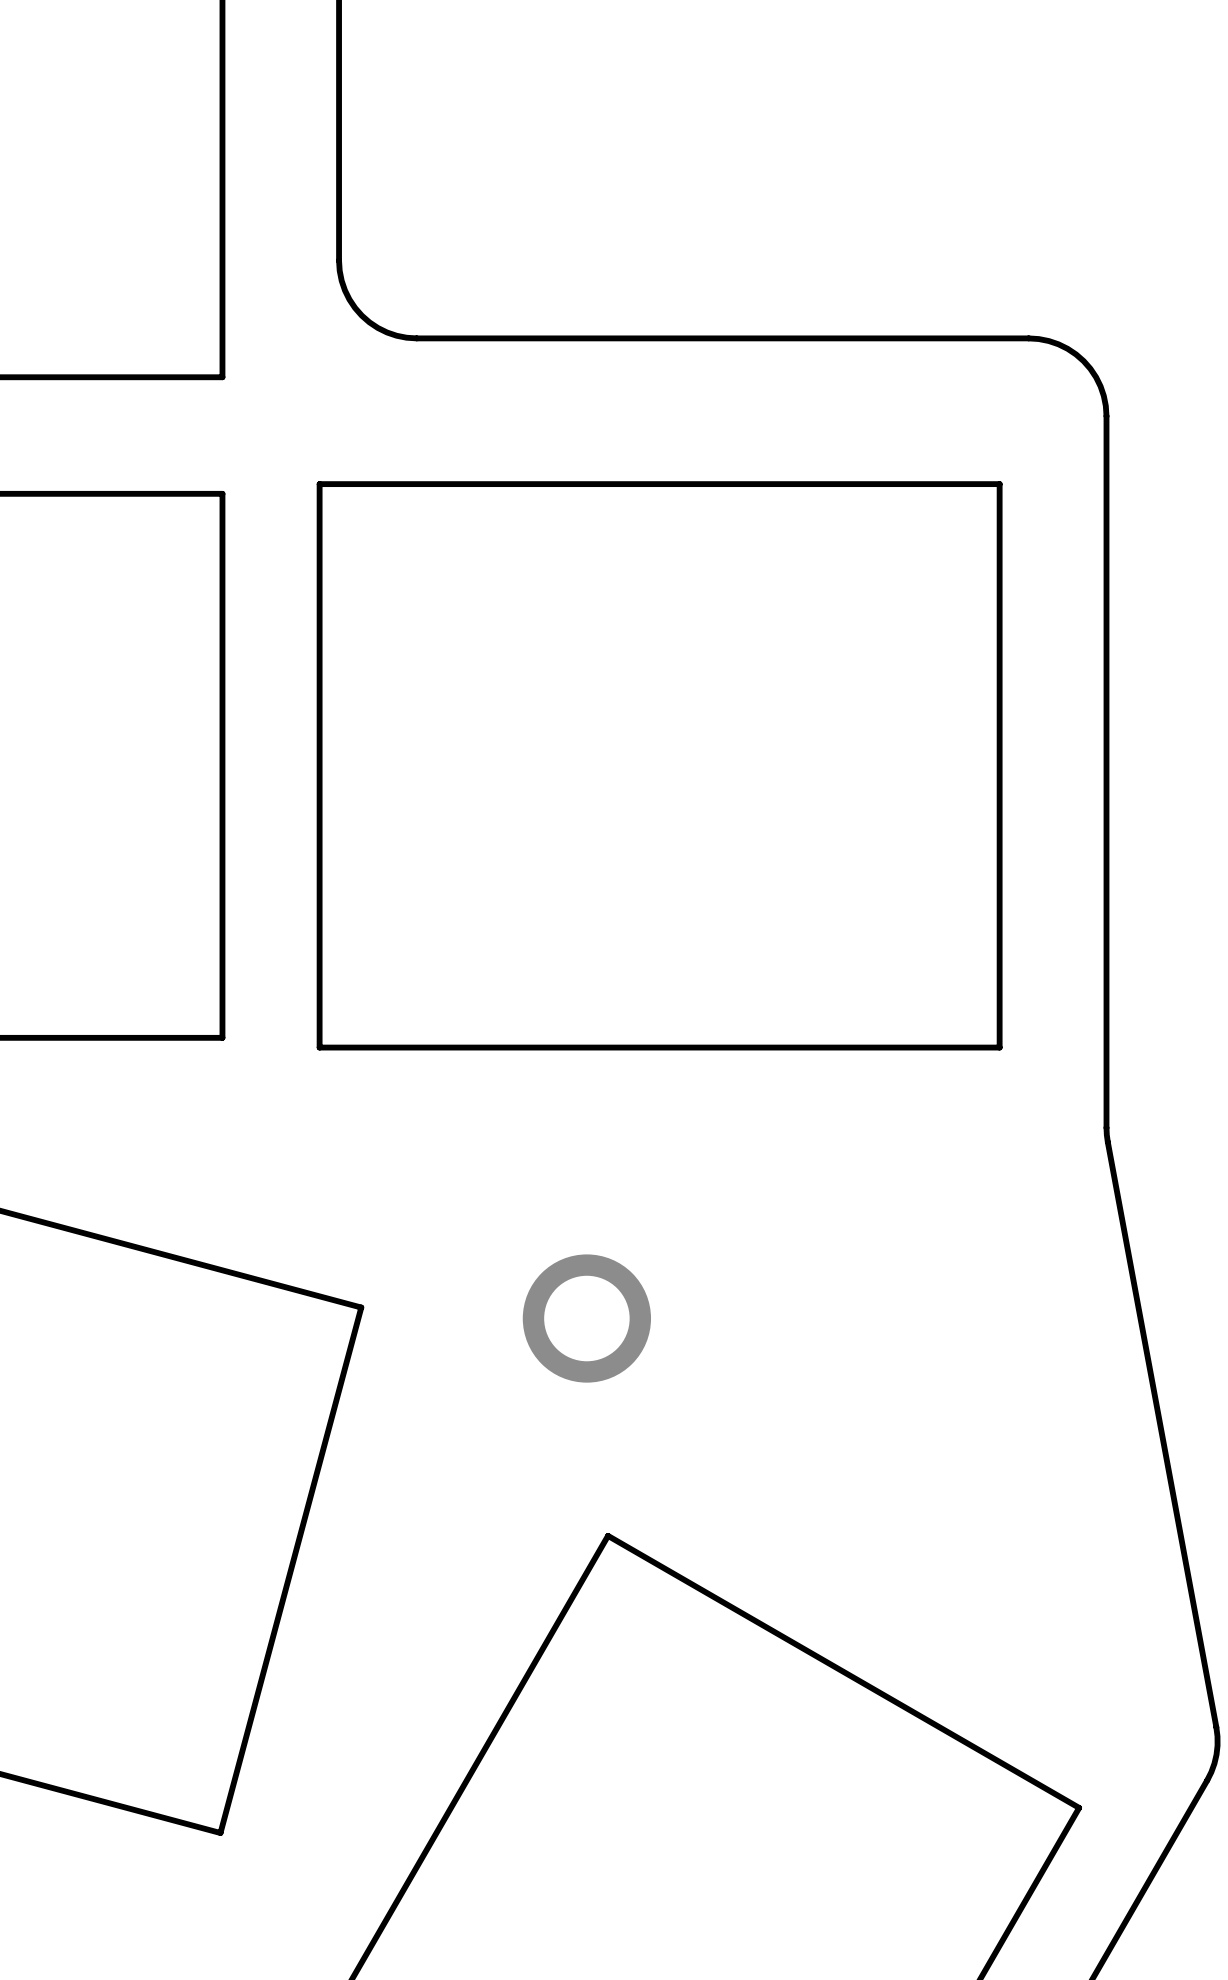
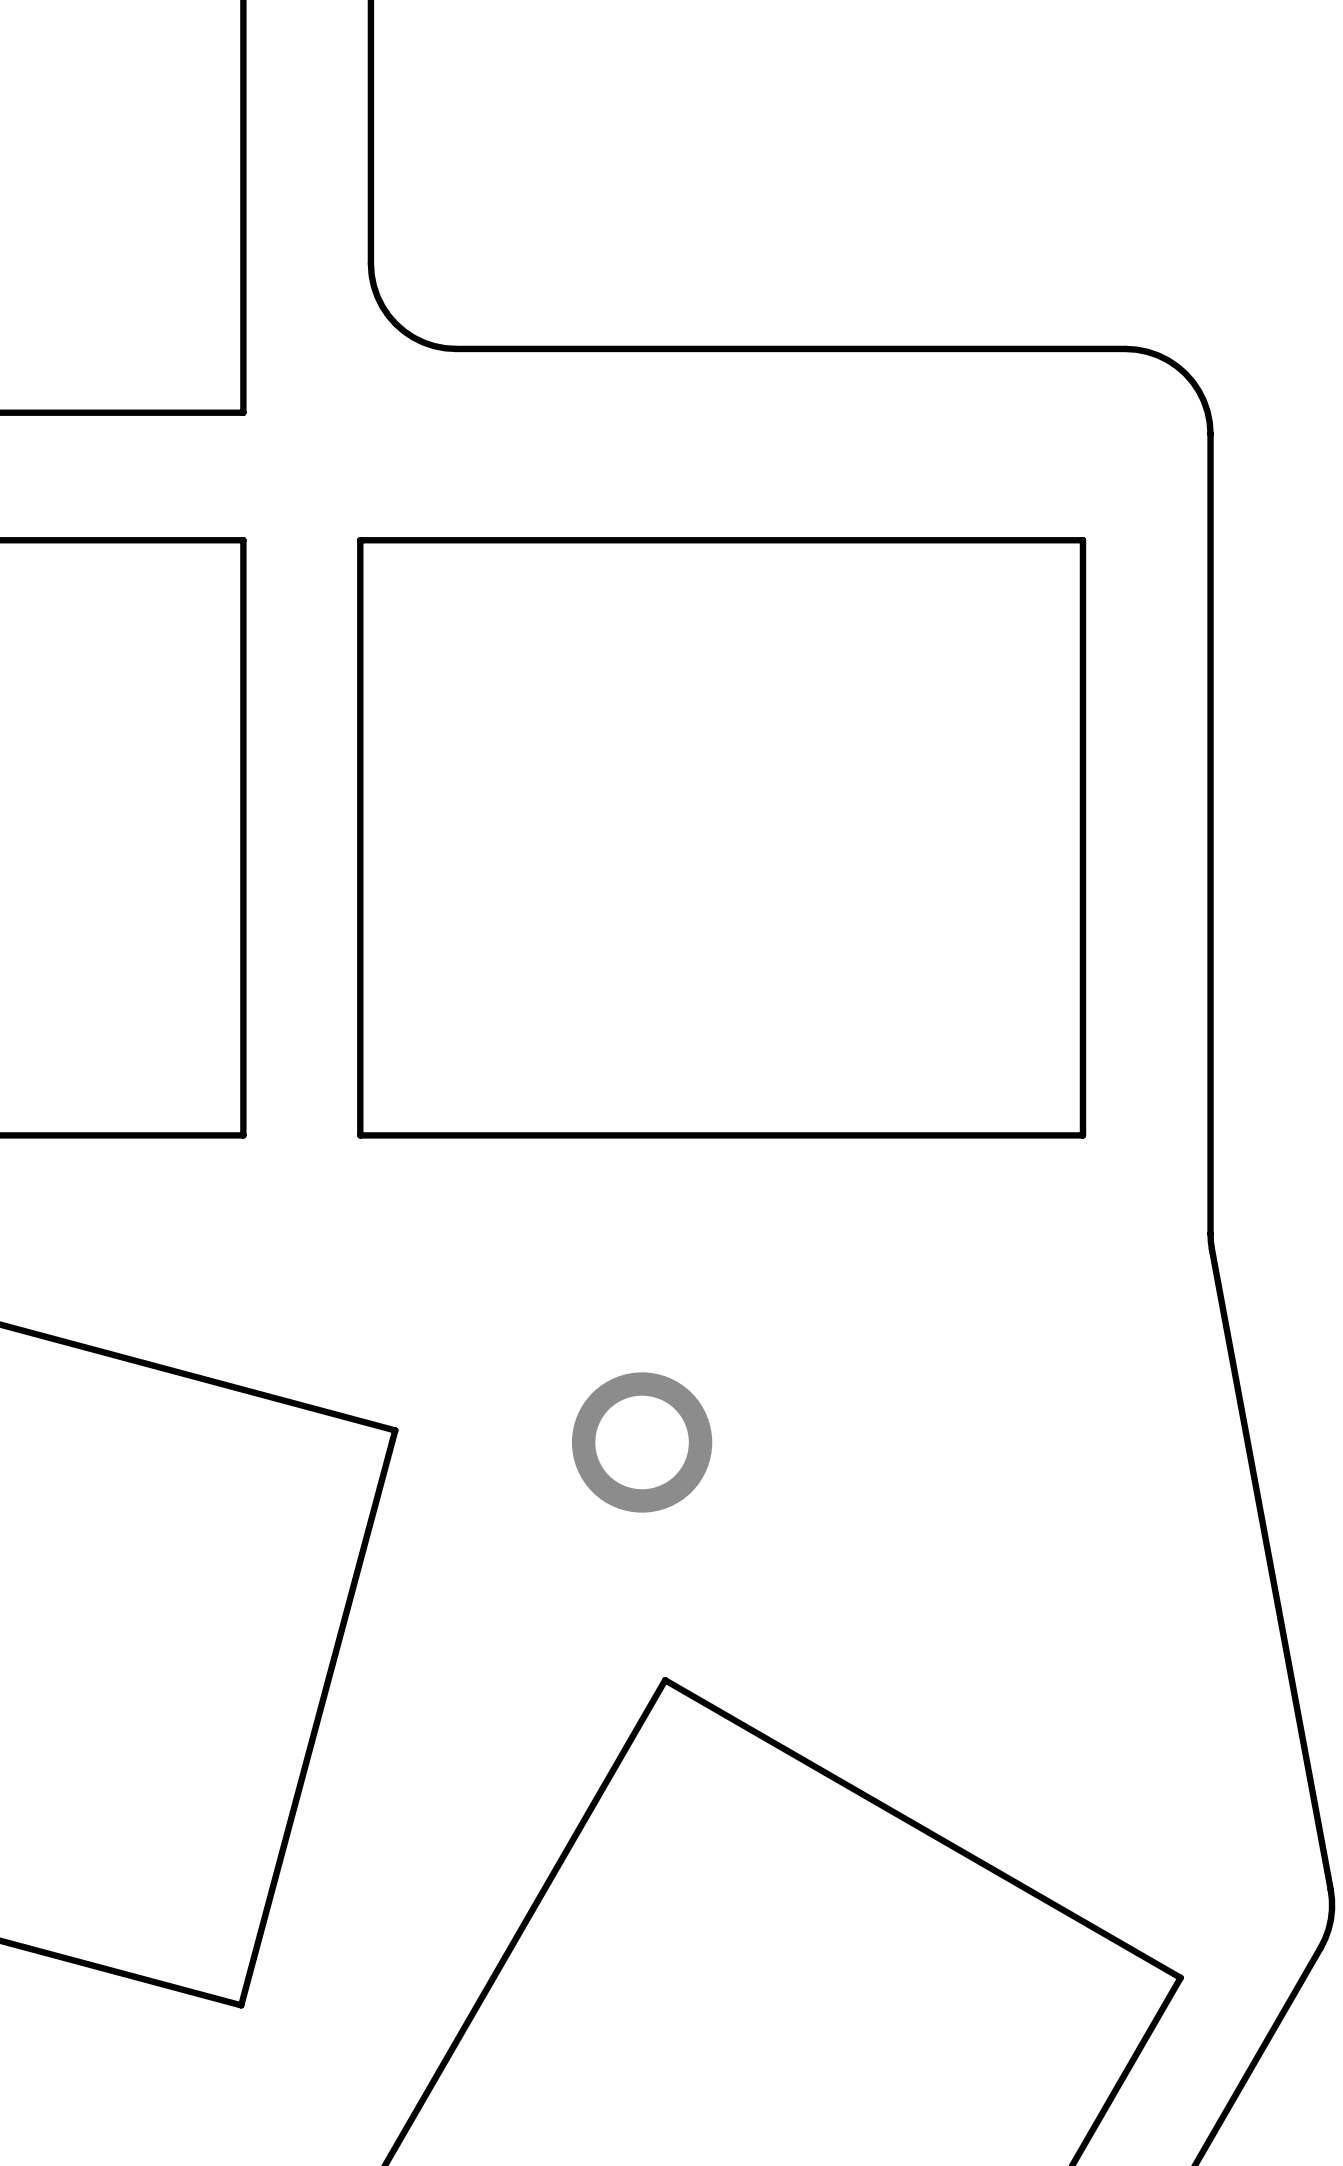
board edge: (339, 241) (339, 270) (349, 299) (369, 322) (396, 335) (416, 338) (1038, 339) (1067, 348) (1083, 361) (1100, 386) (1106, 416) -> (370, 263) (377, 296) (395, 324) (413, 337) (444, 348) (1125, 348) (1147, 351) (1177, 366) (1199, 391) (1209, 422) (1210, 455)
board edge: (319, 484) (999, 484) (999, 1047) (319, 1047) (319, 484) -> (360, 540) (360, 1135) (1082, 1135) (1082, 540) (360, 540)

